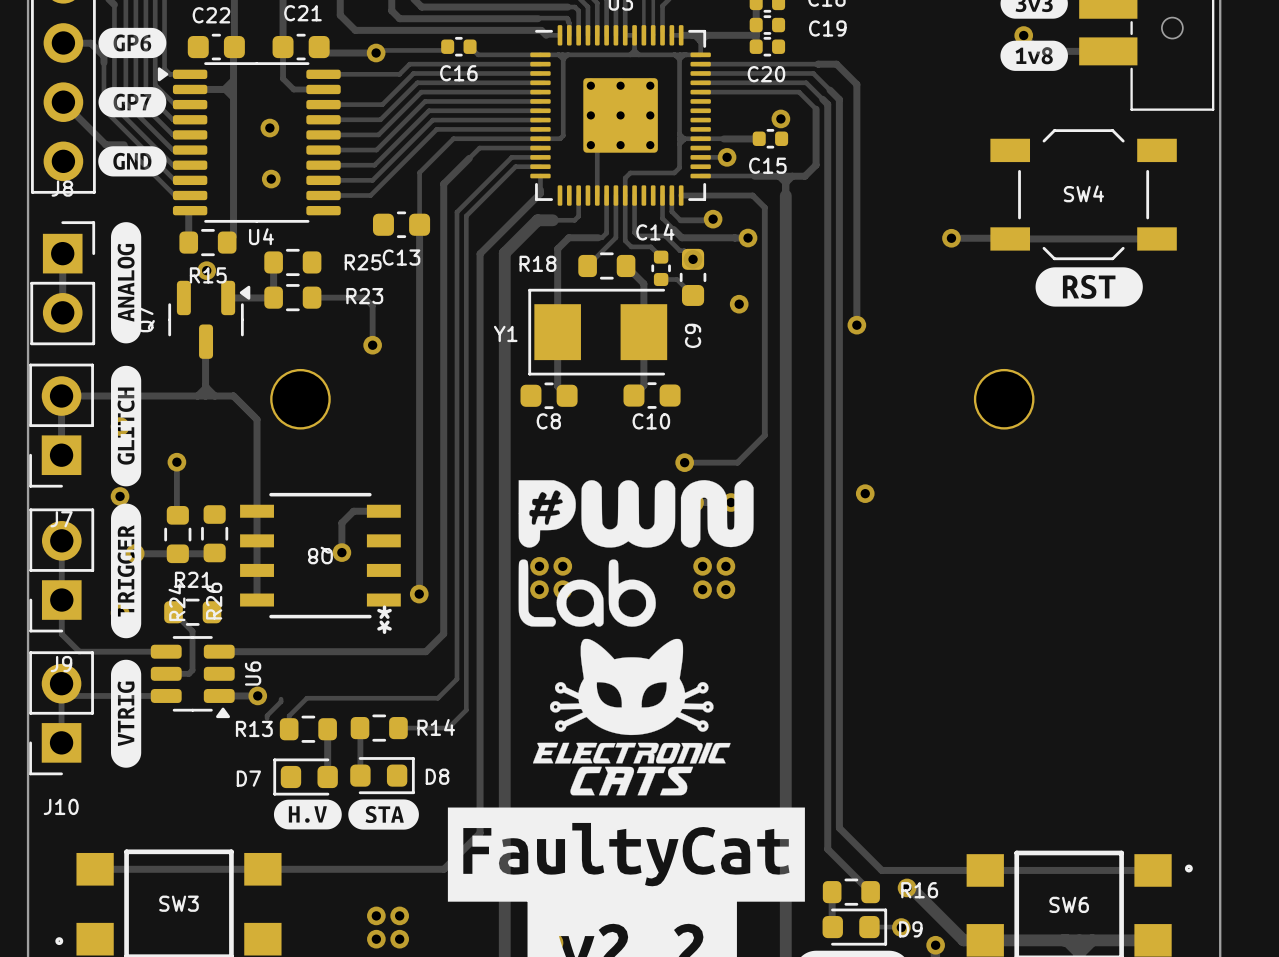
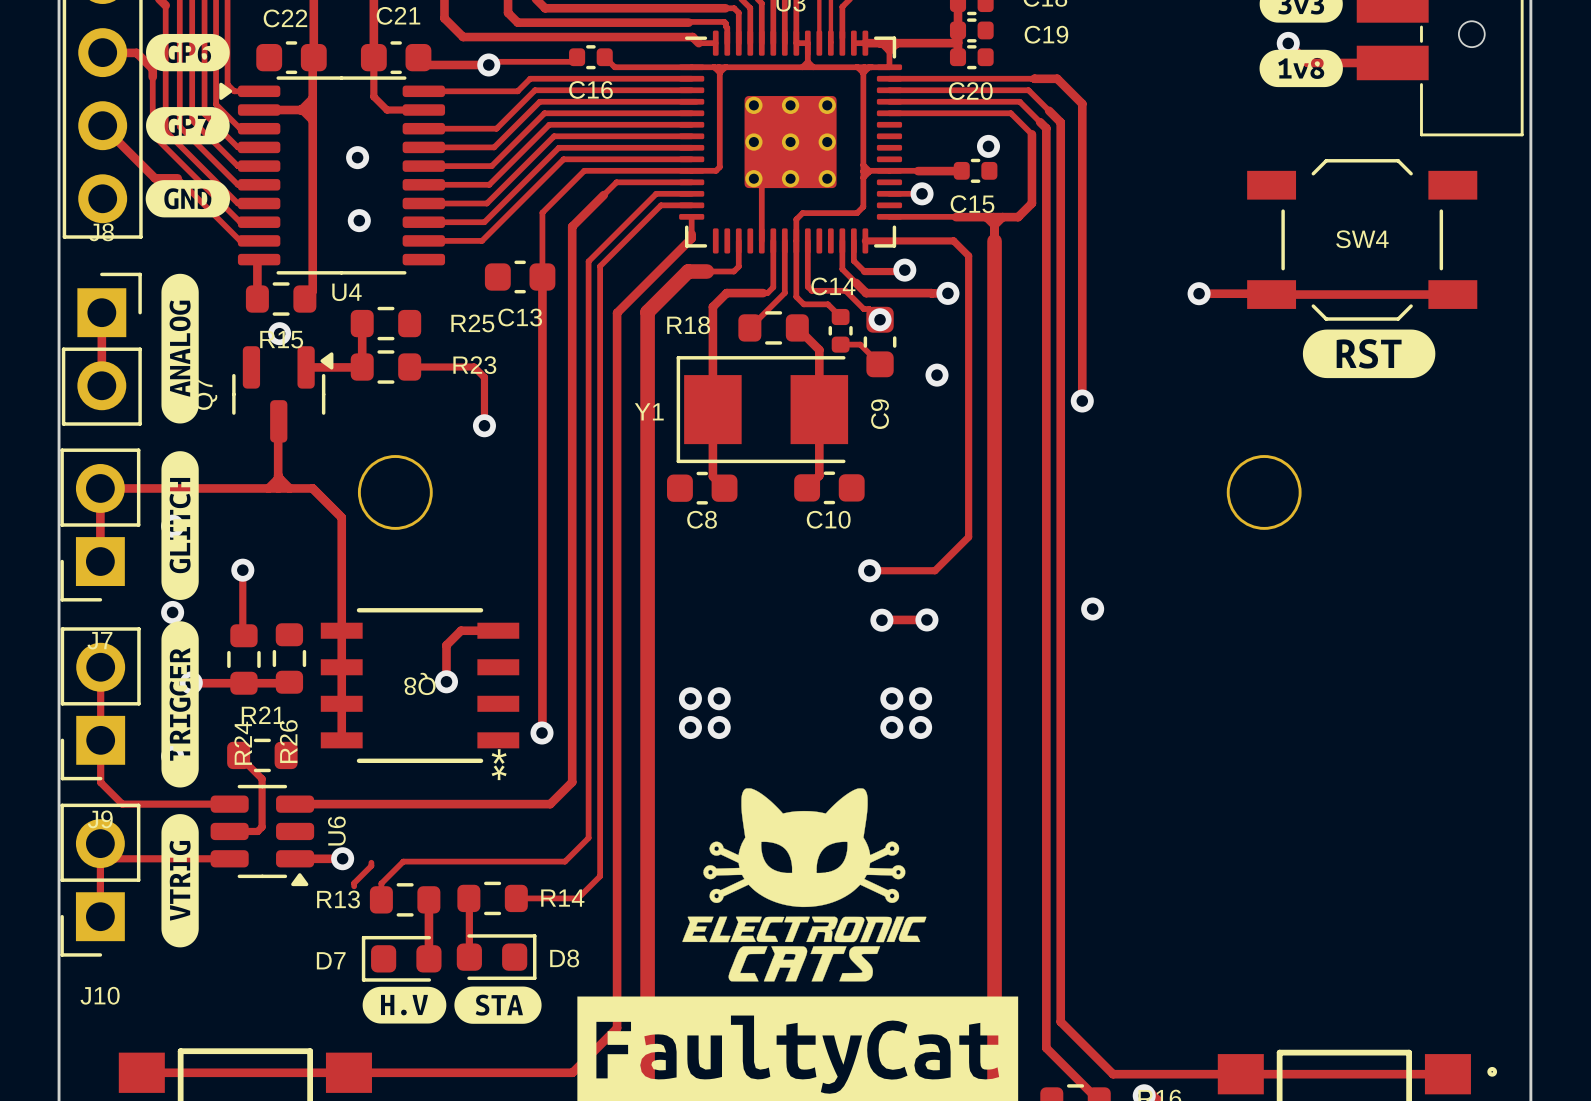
drawing: [518, 480, 754, 627] -> none

